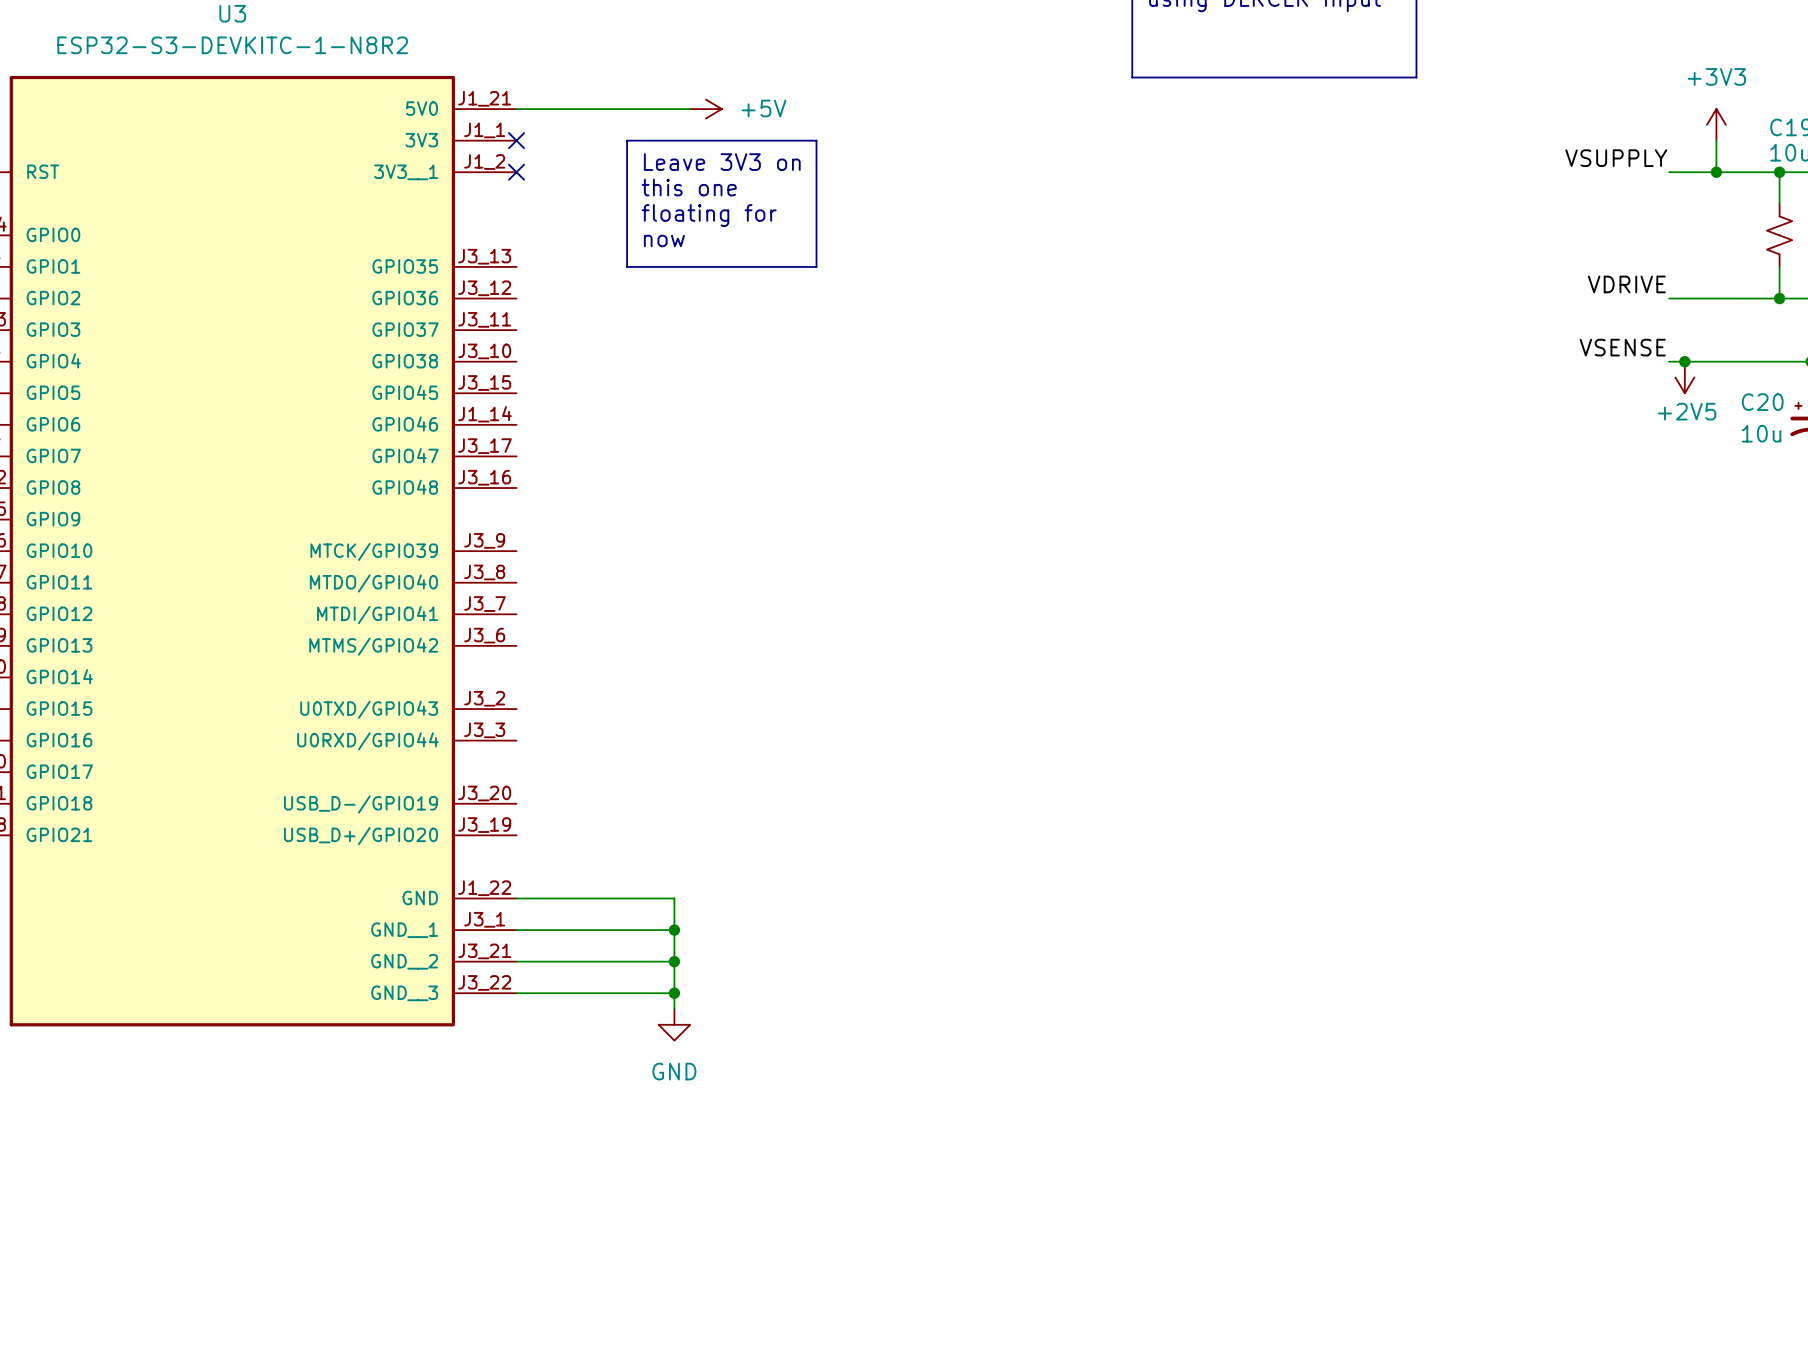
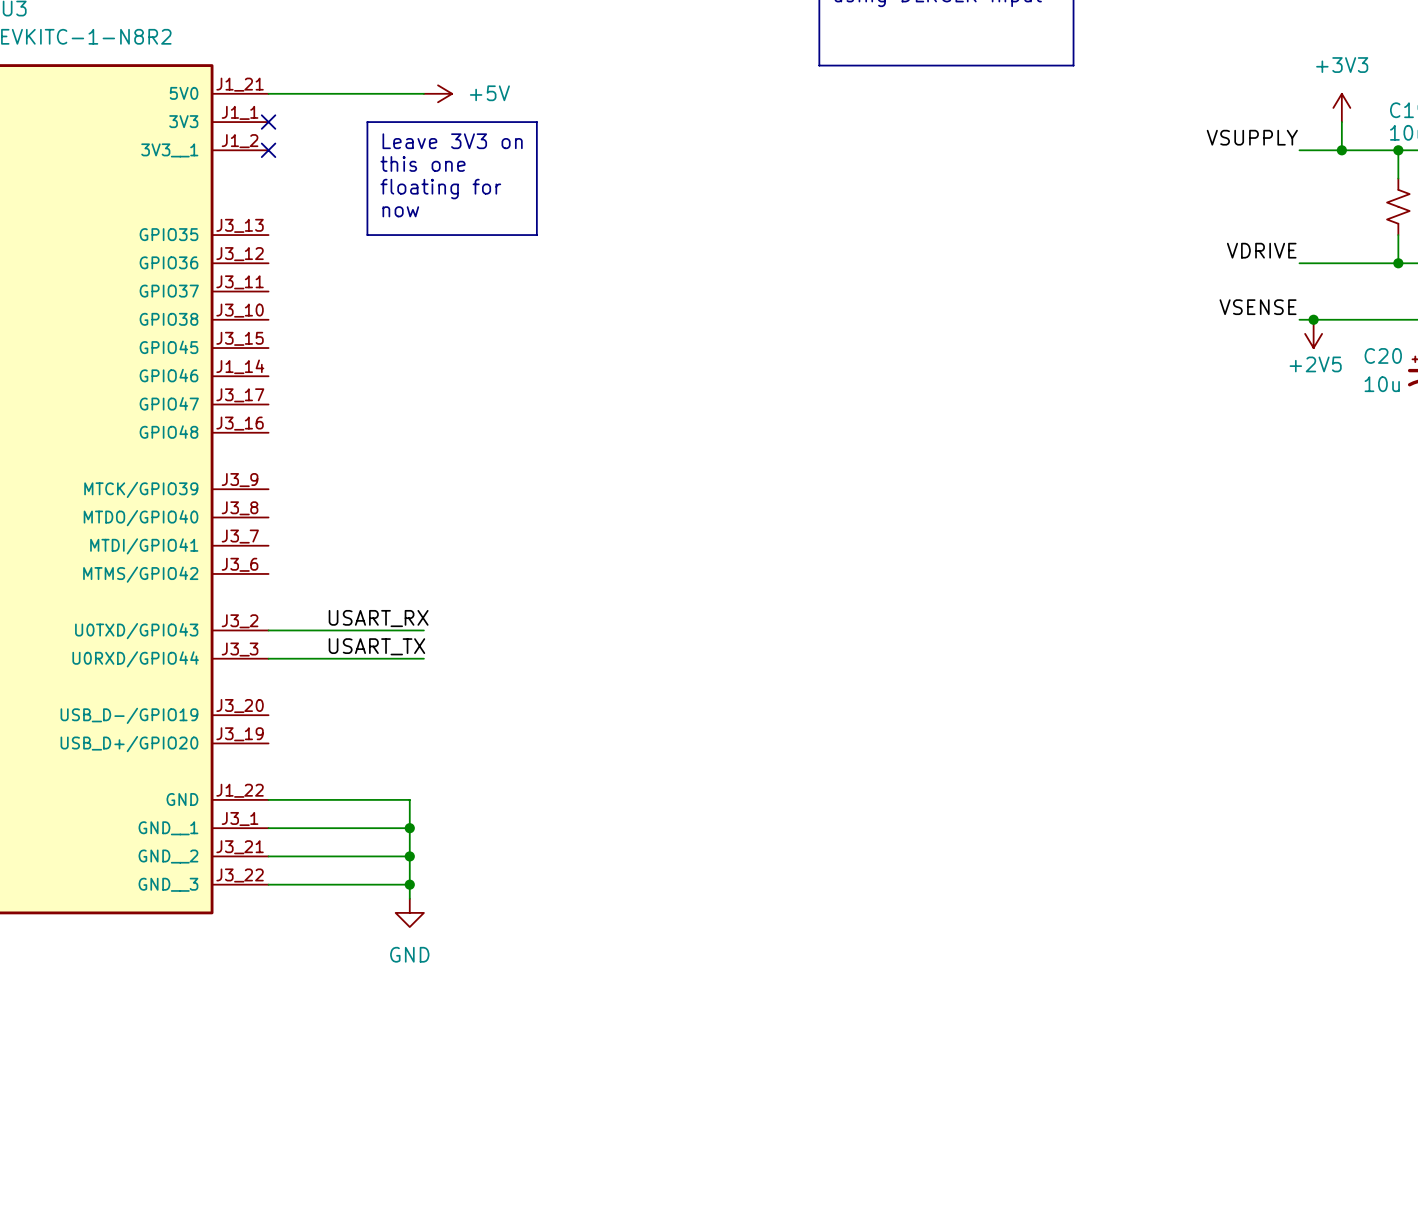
label: none -> USART_RX (378, 618)
wire: none -> (268, 630) (423, 630)
label: none -> USART_TX (376, 646)
wire: none -> (268, 658) (423, 658)

